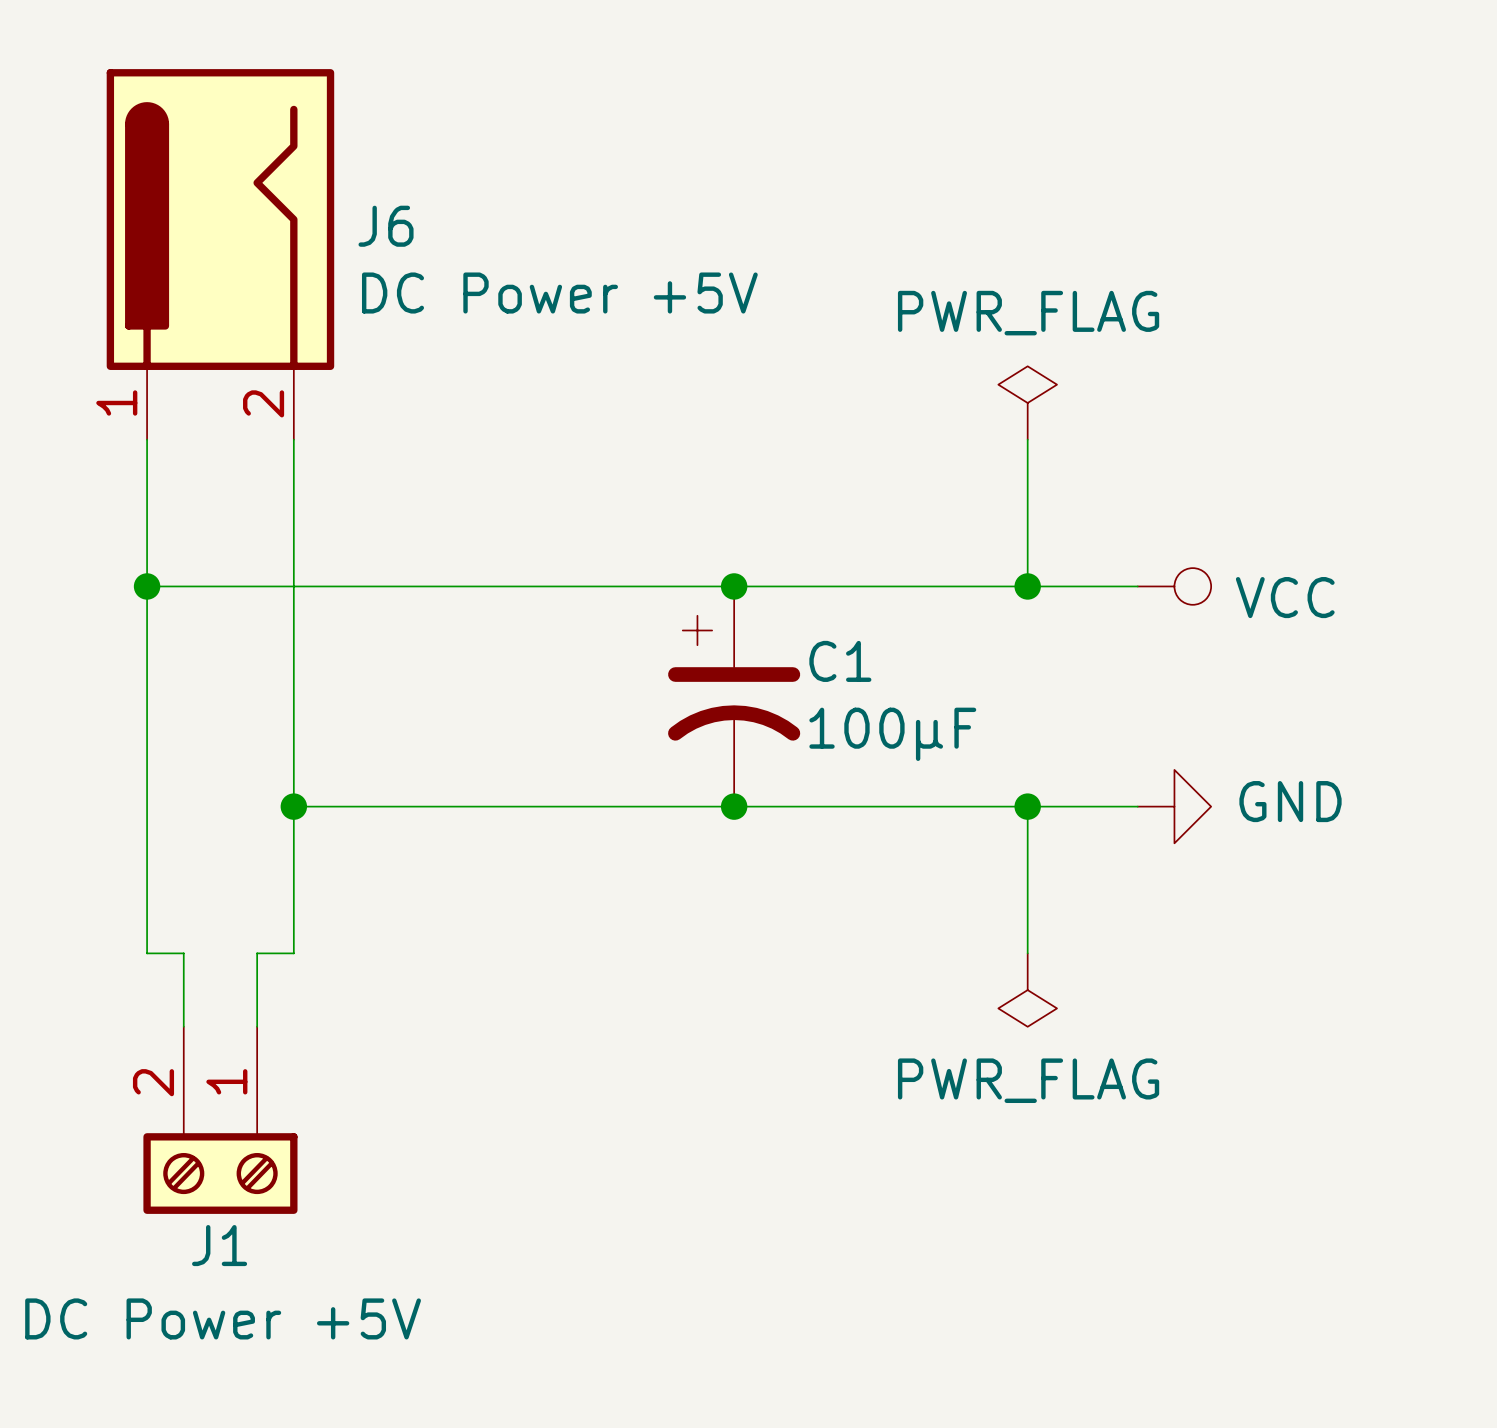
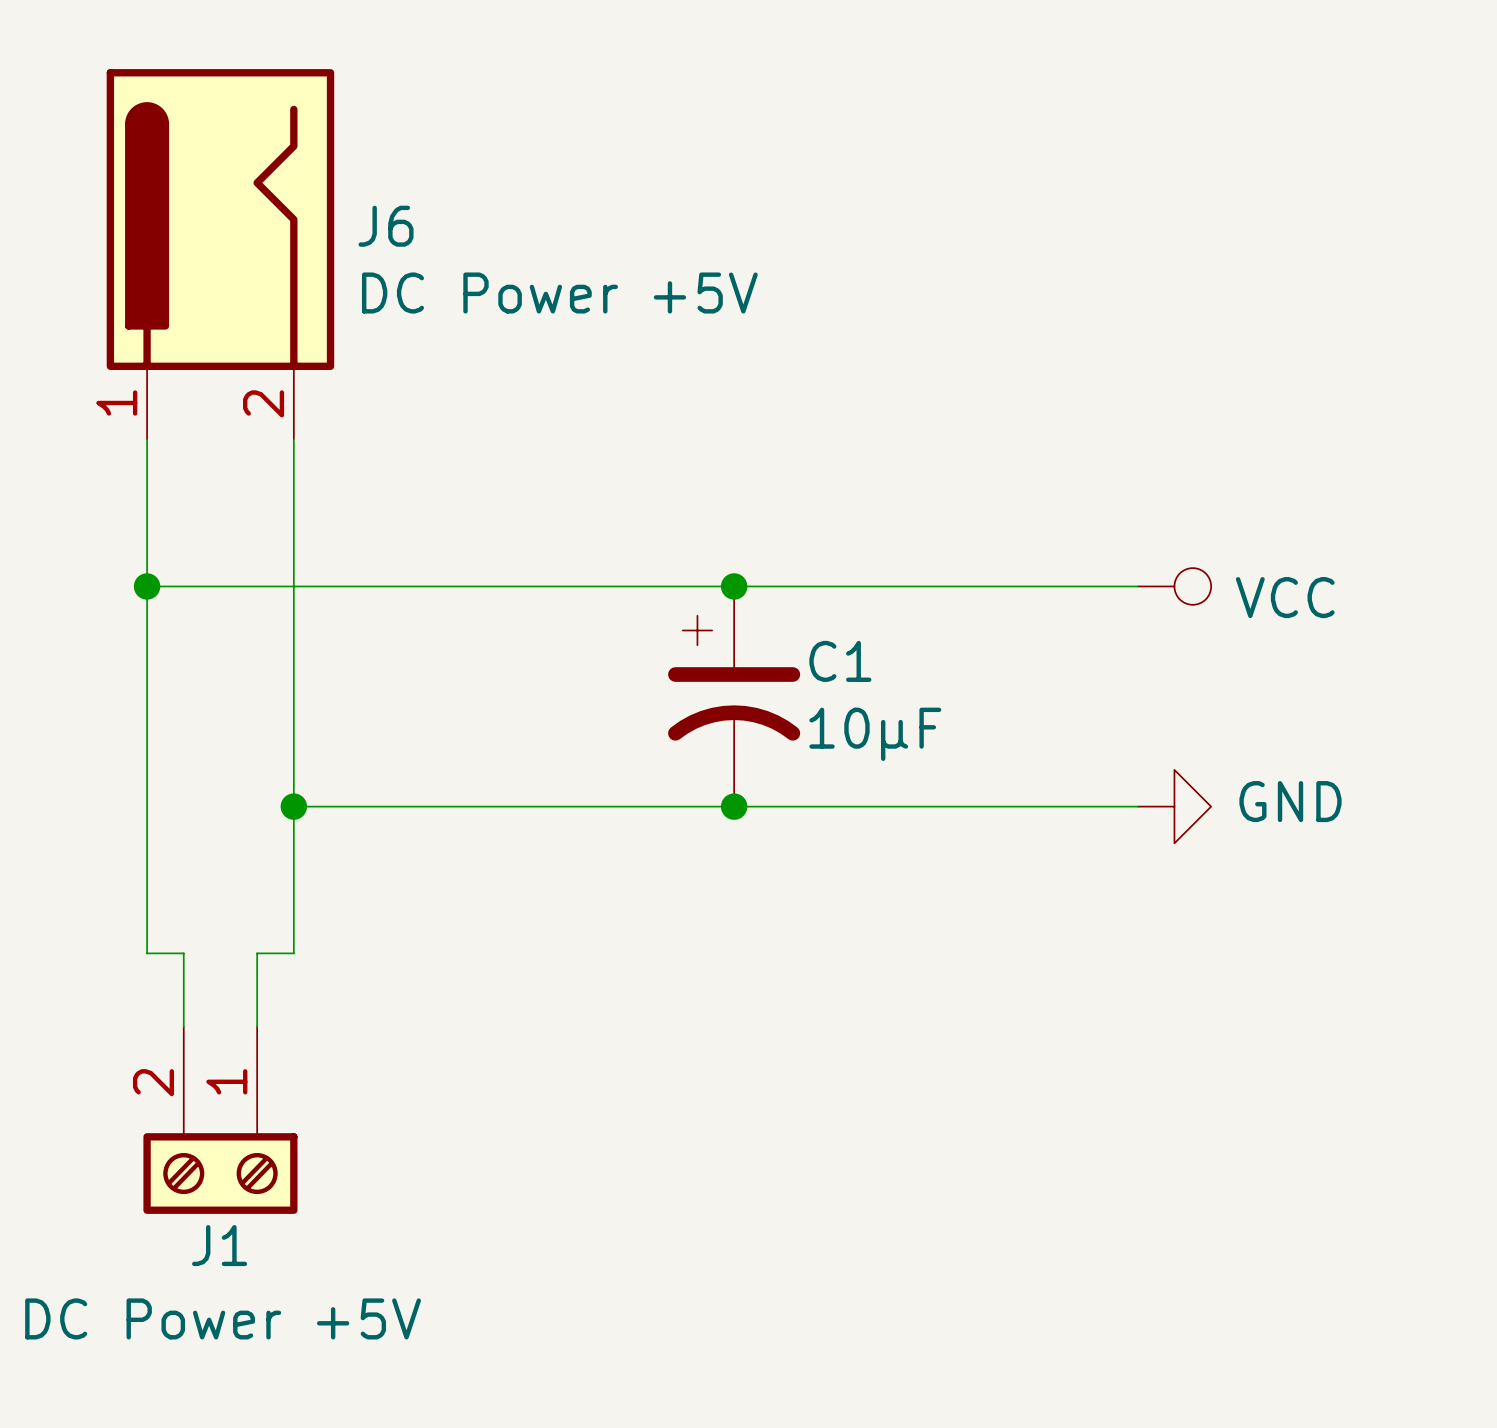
power symbol: PWR_FLAG (1027, 403) -> none
wire: (1027, 439) (1027, 586) -> none
junction: (1027, 586) -> none
C1 value: 100µF (892, 734) -> 10µF (875, 734)
wire: (1027, 806) (1027, 953) -> none
junction: (1027, 806) -> none
power symbol: PWR_FLAG (1027, 990) -> none

